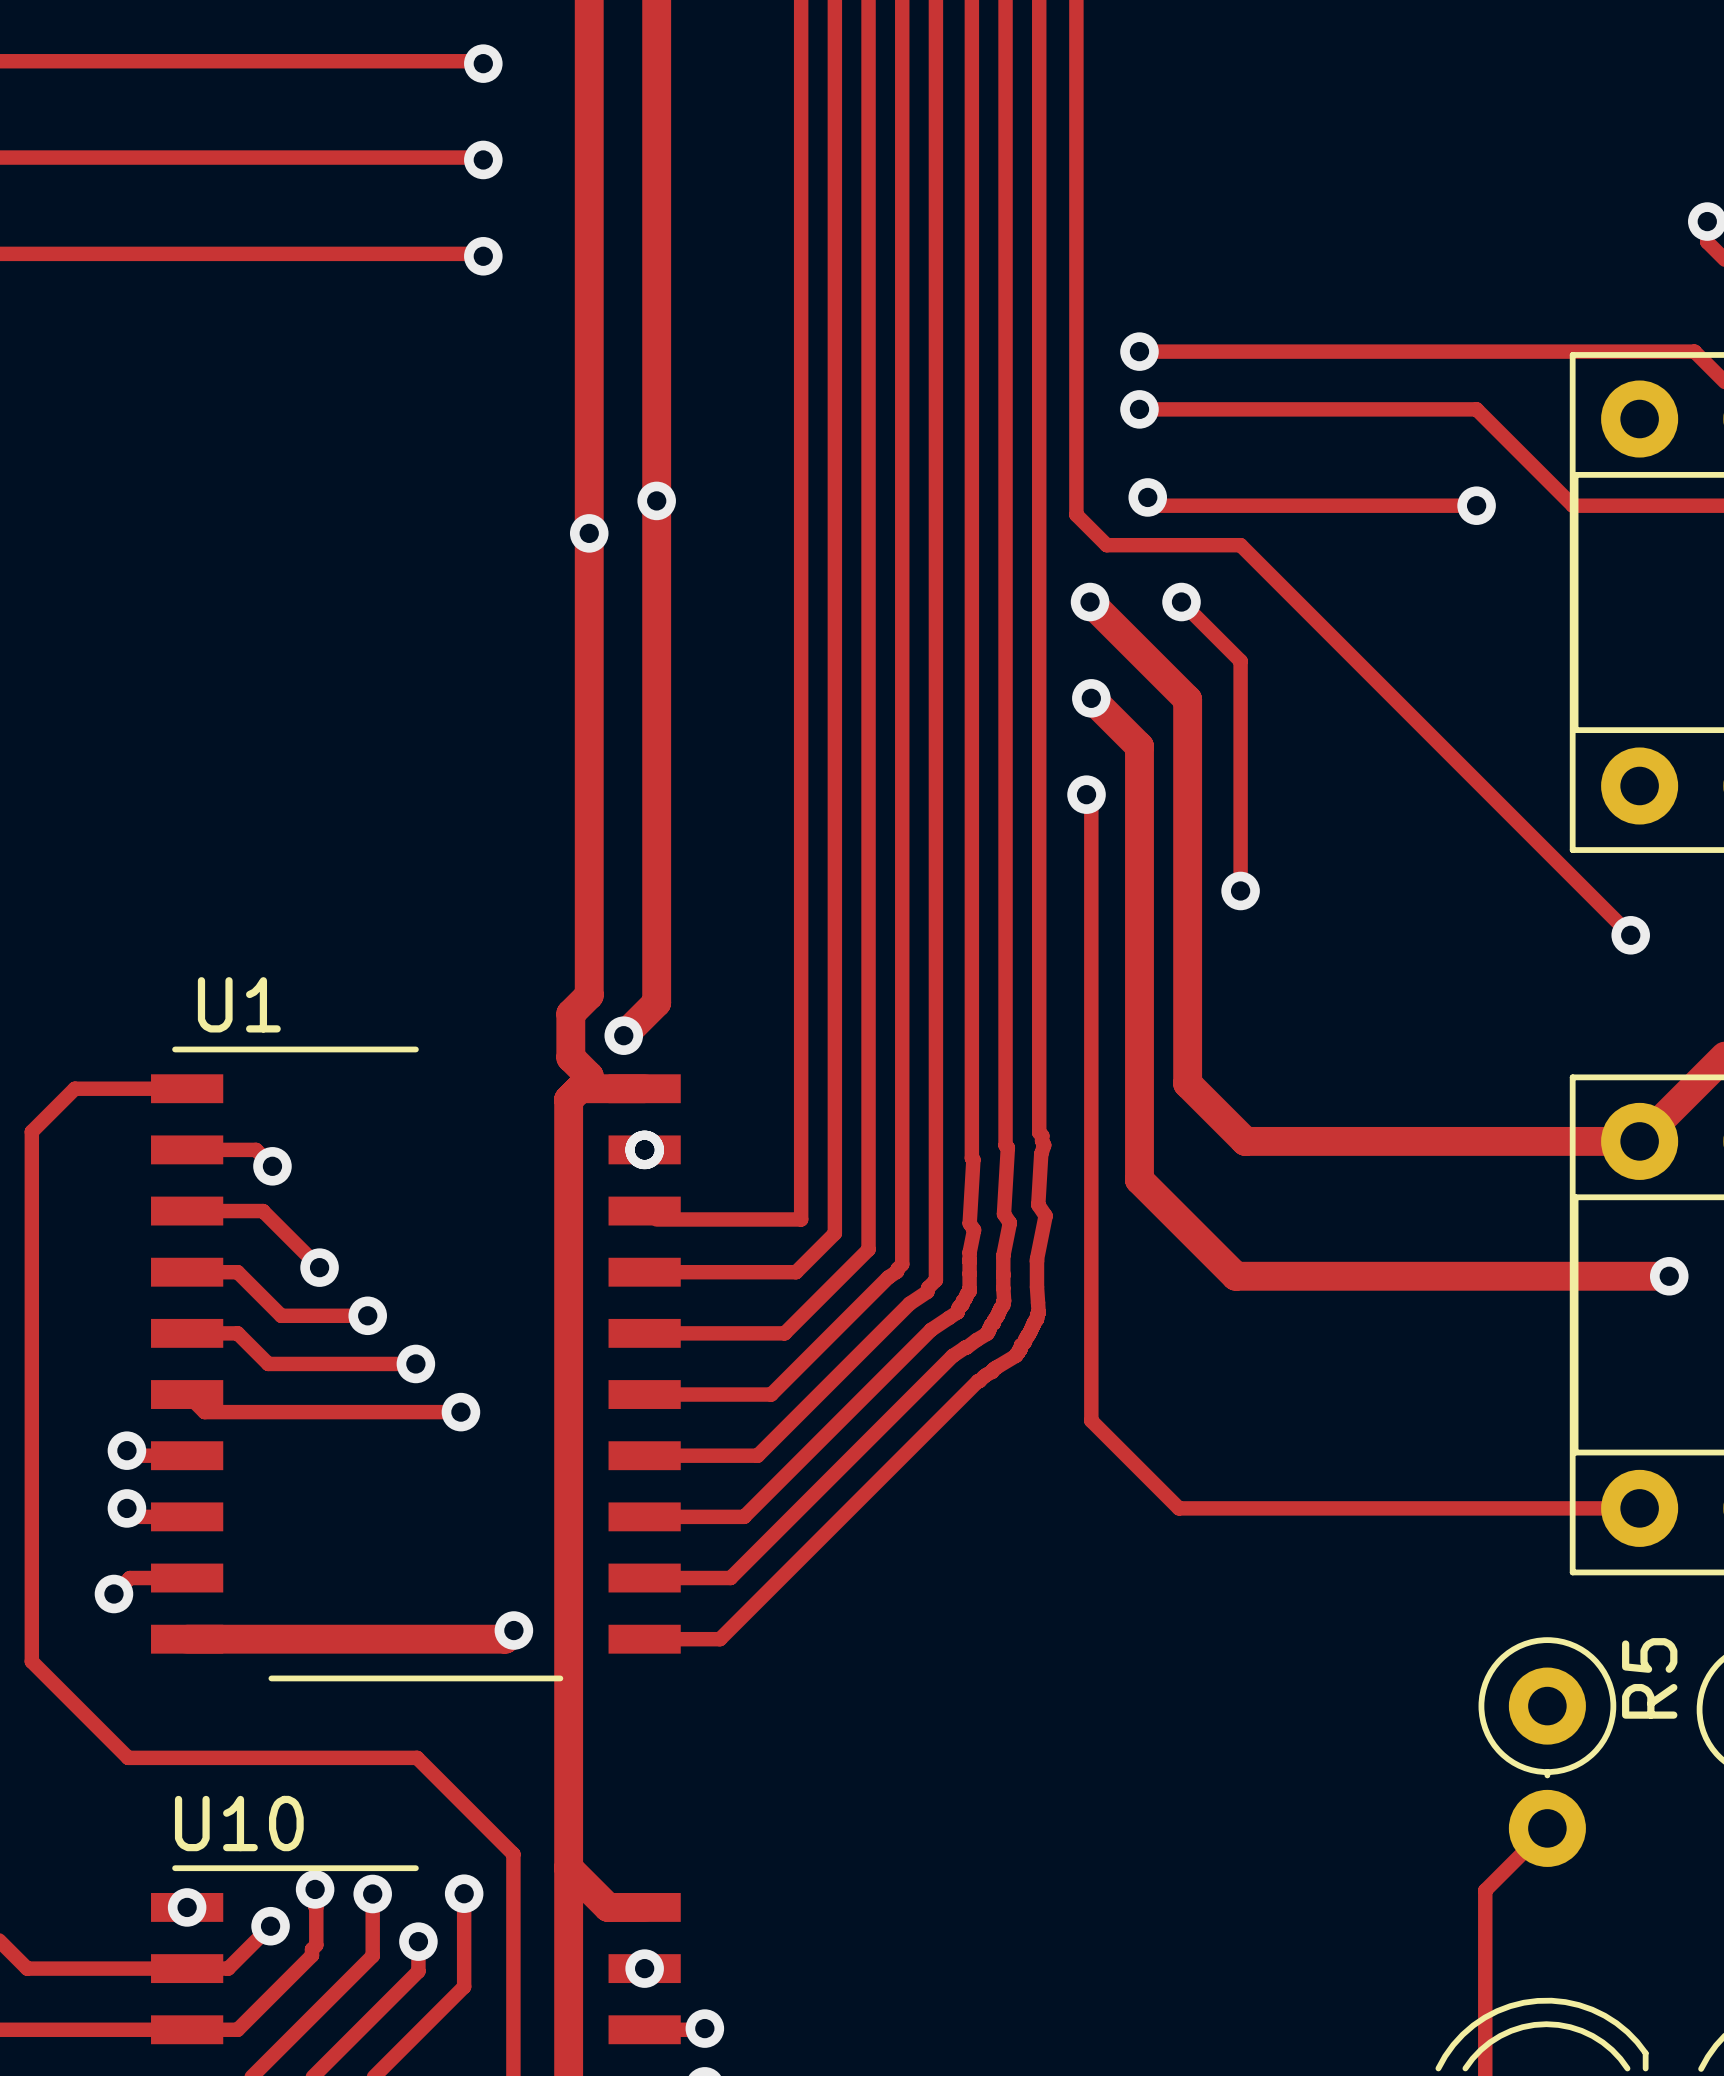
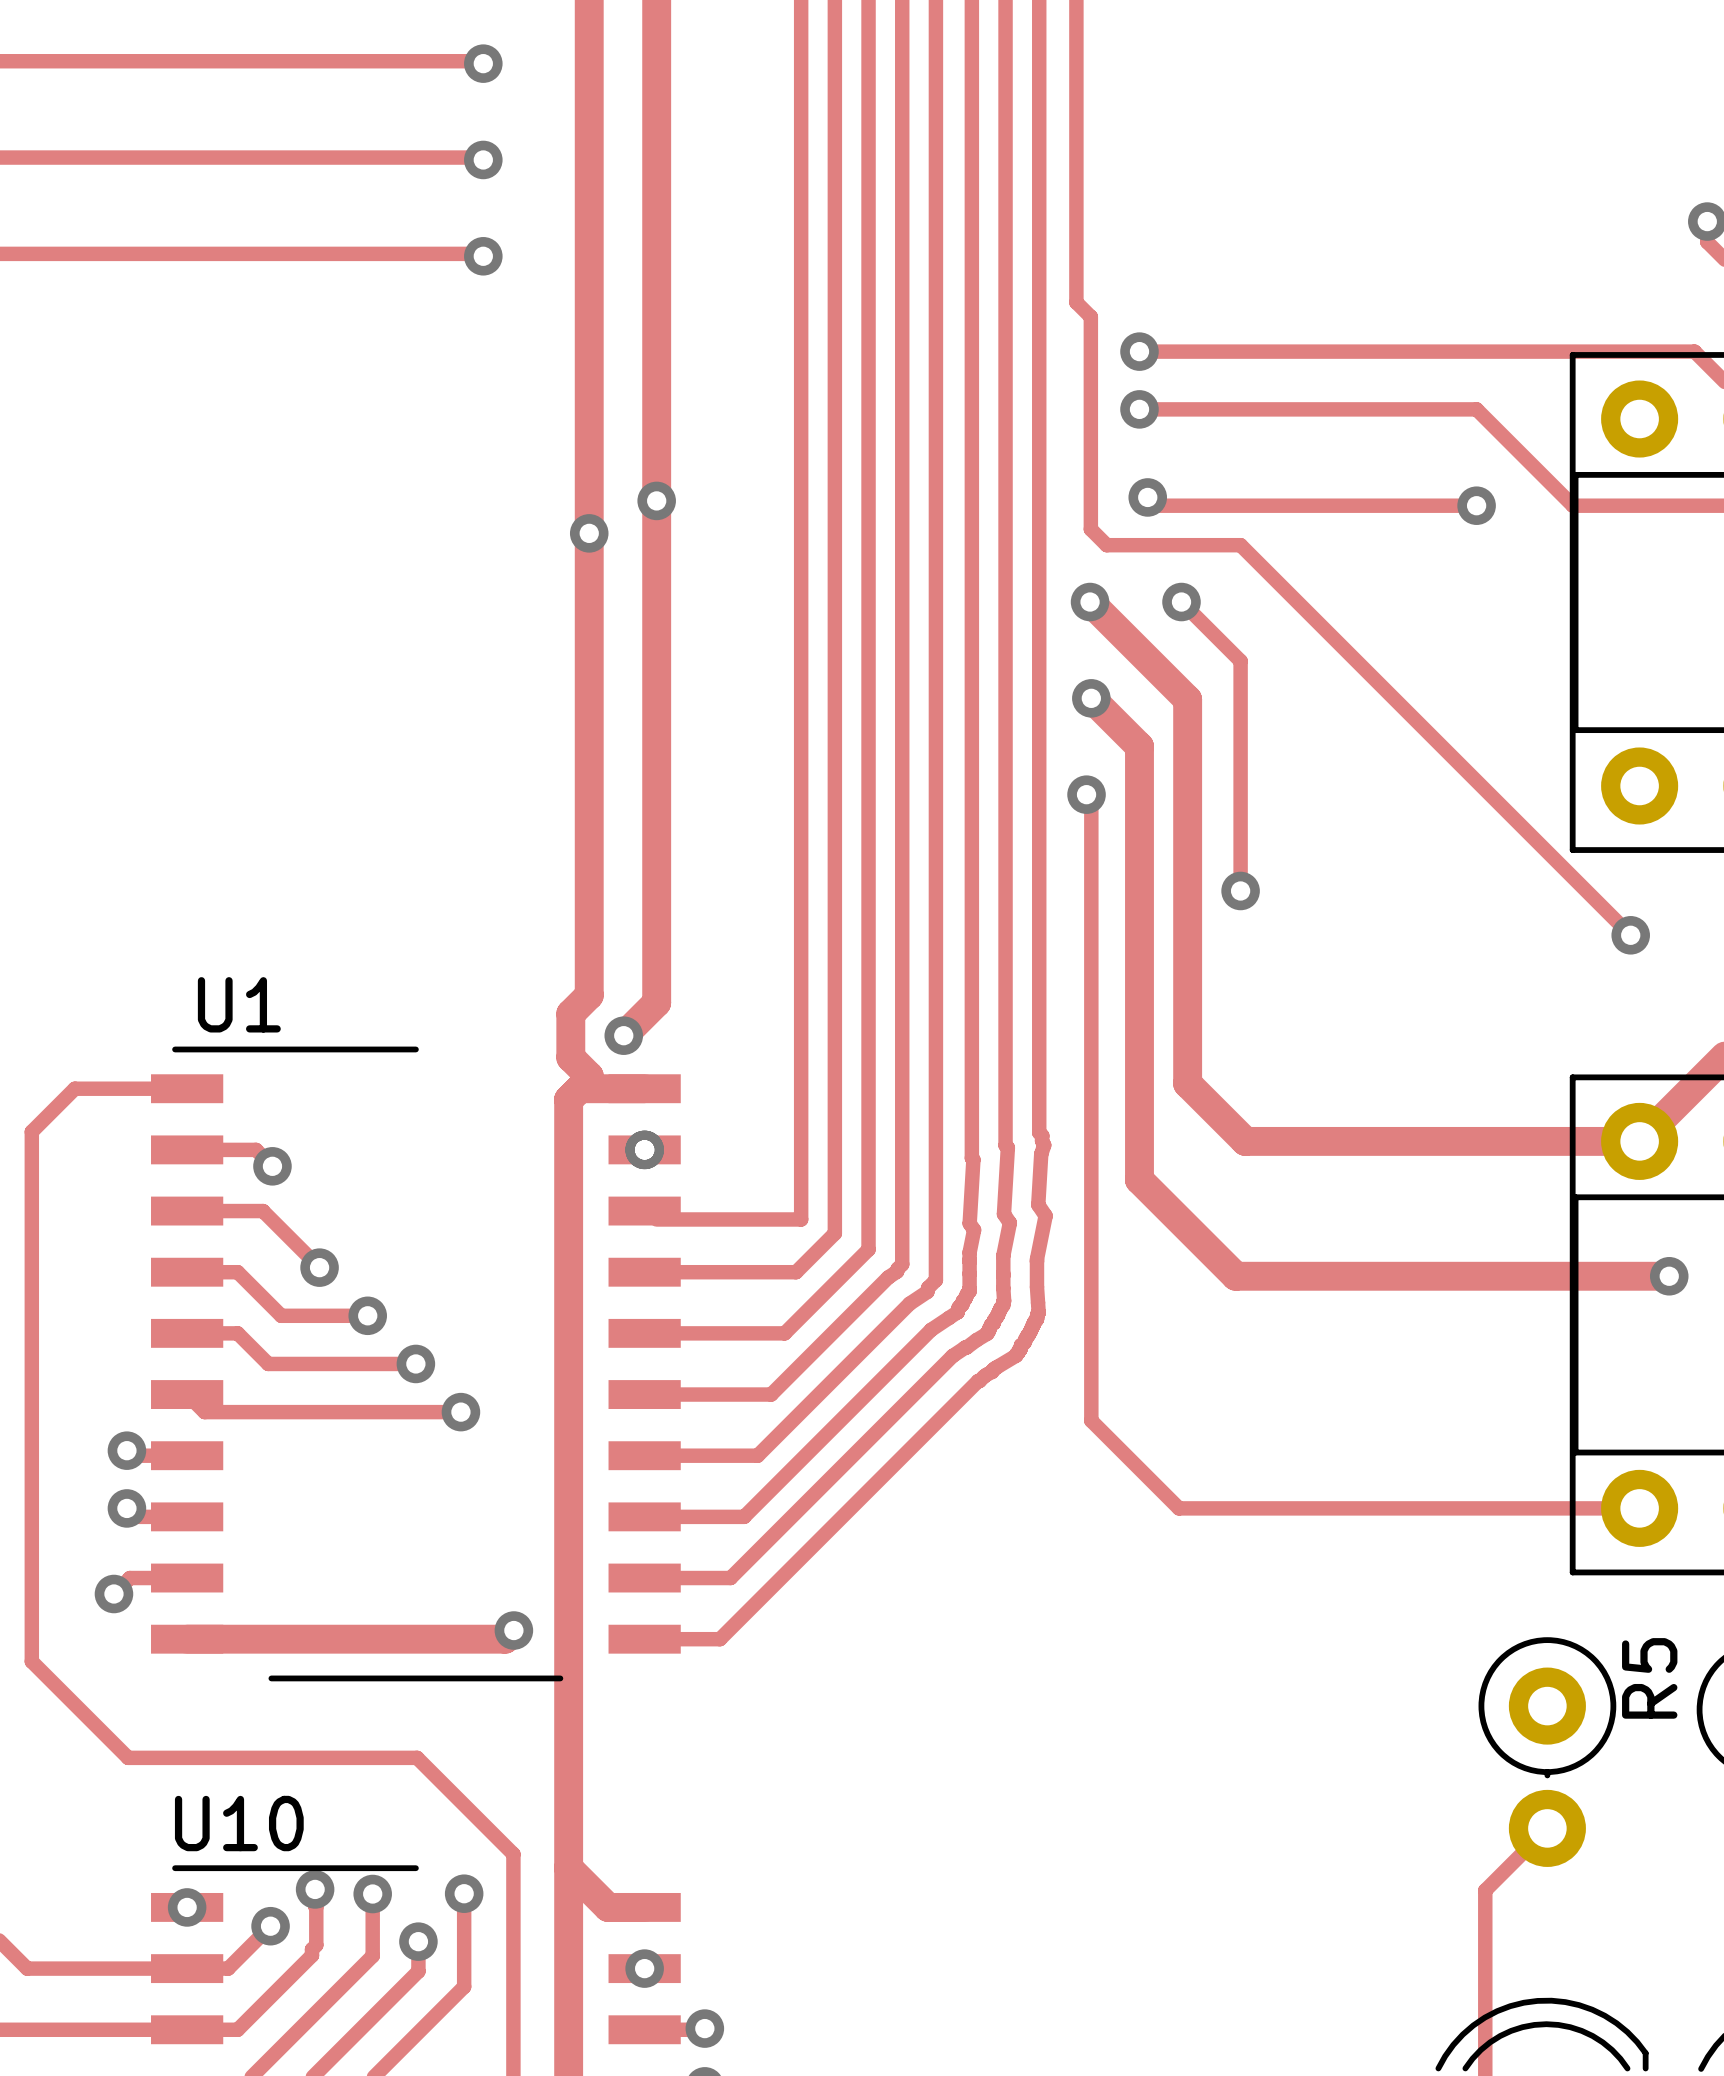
track: (1076, 302) (1076, 514) (1090, 529) -> (1076, 302) (1090, 316) (1090, 529)

